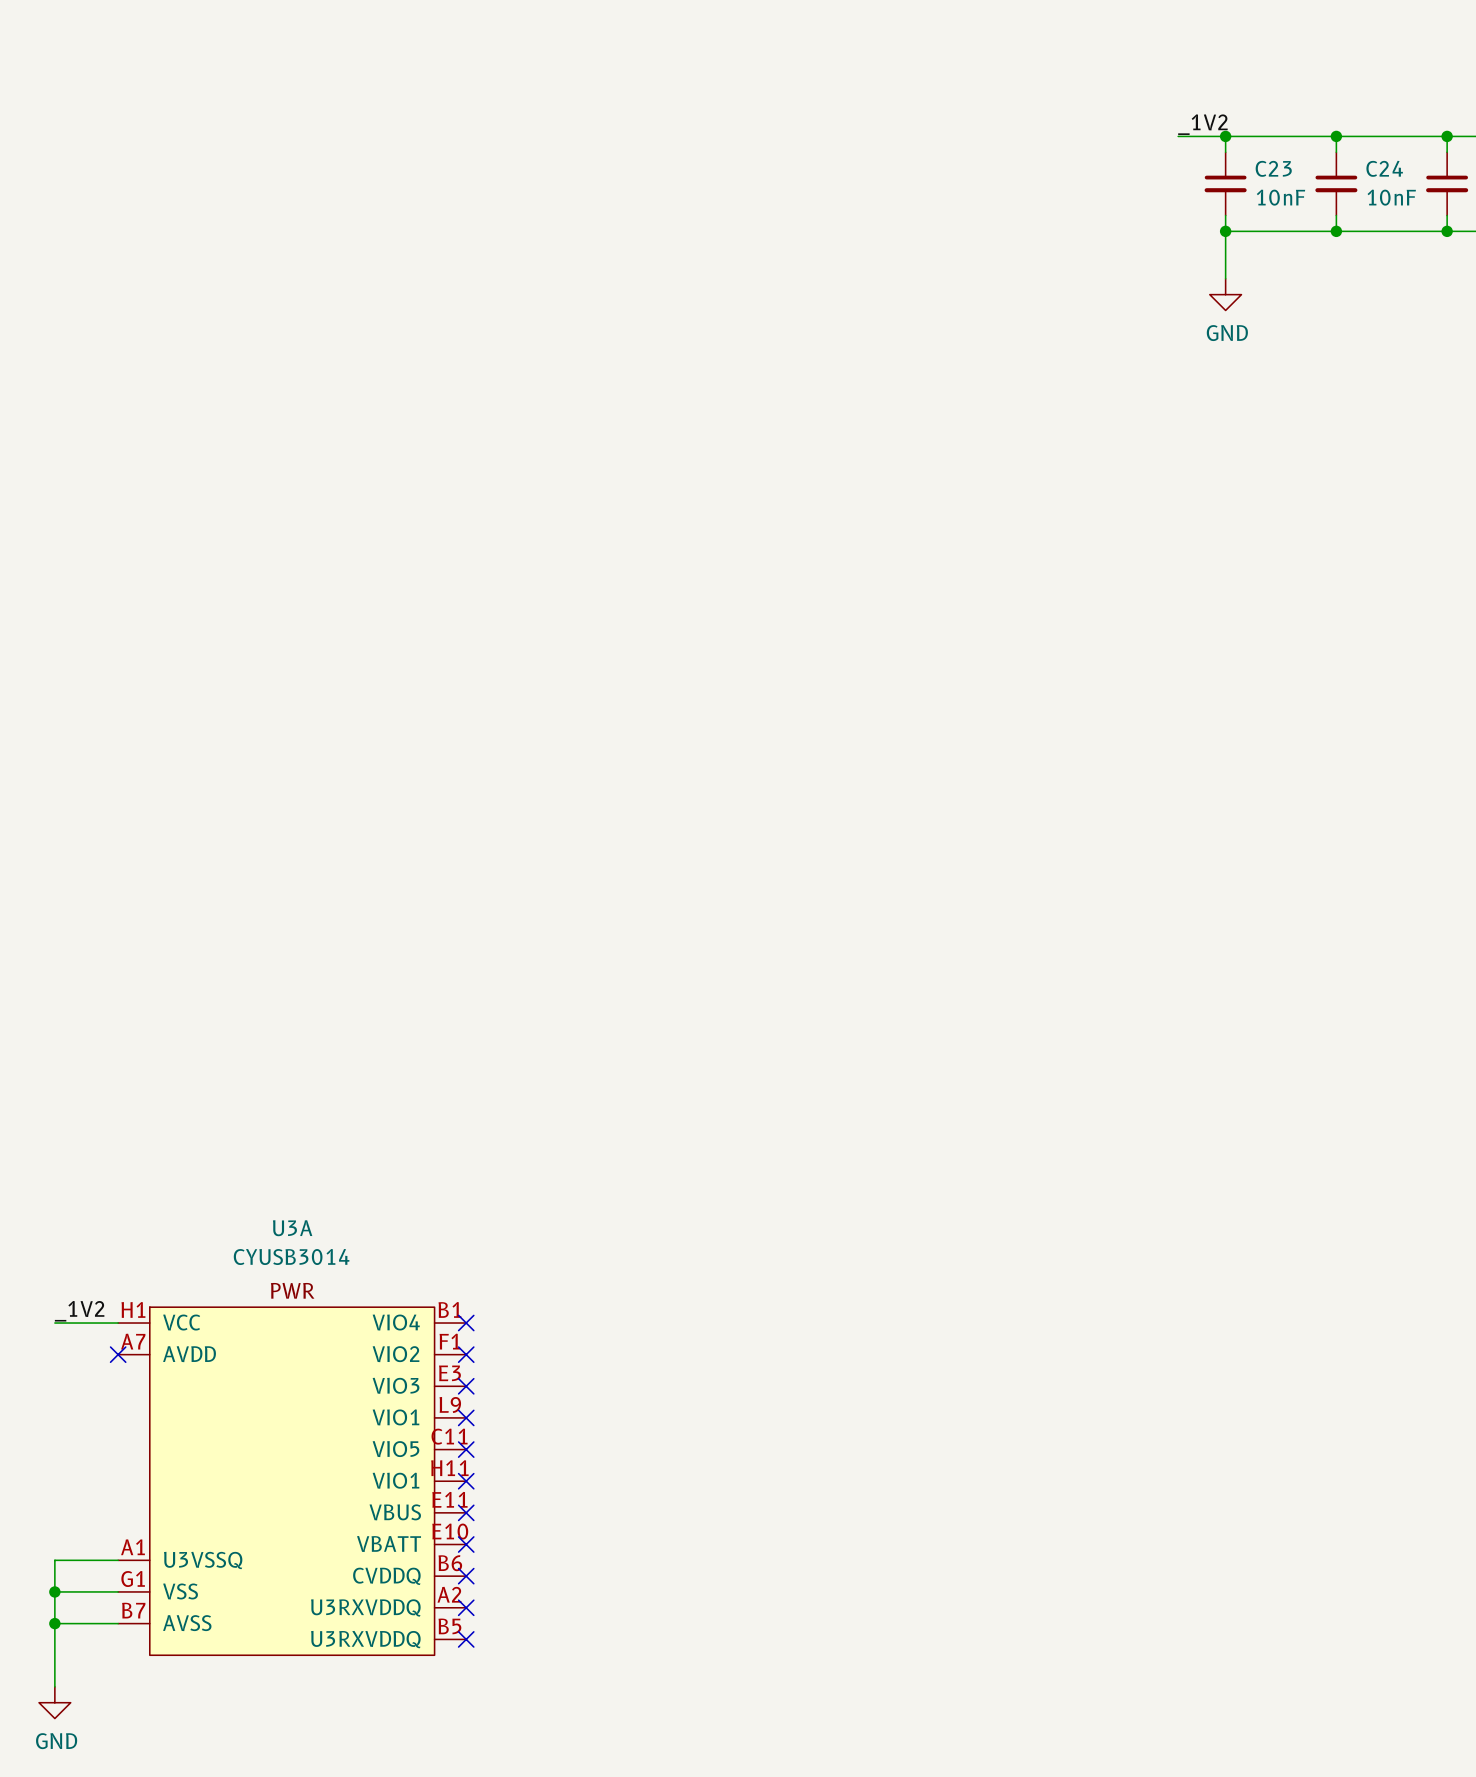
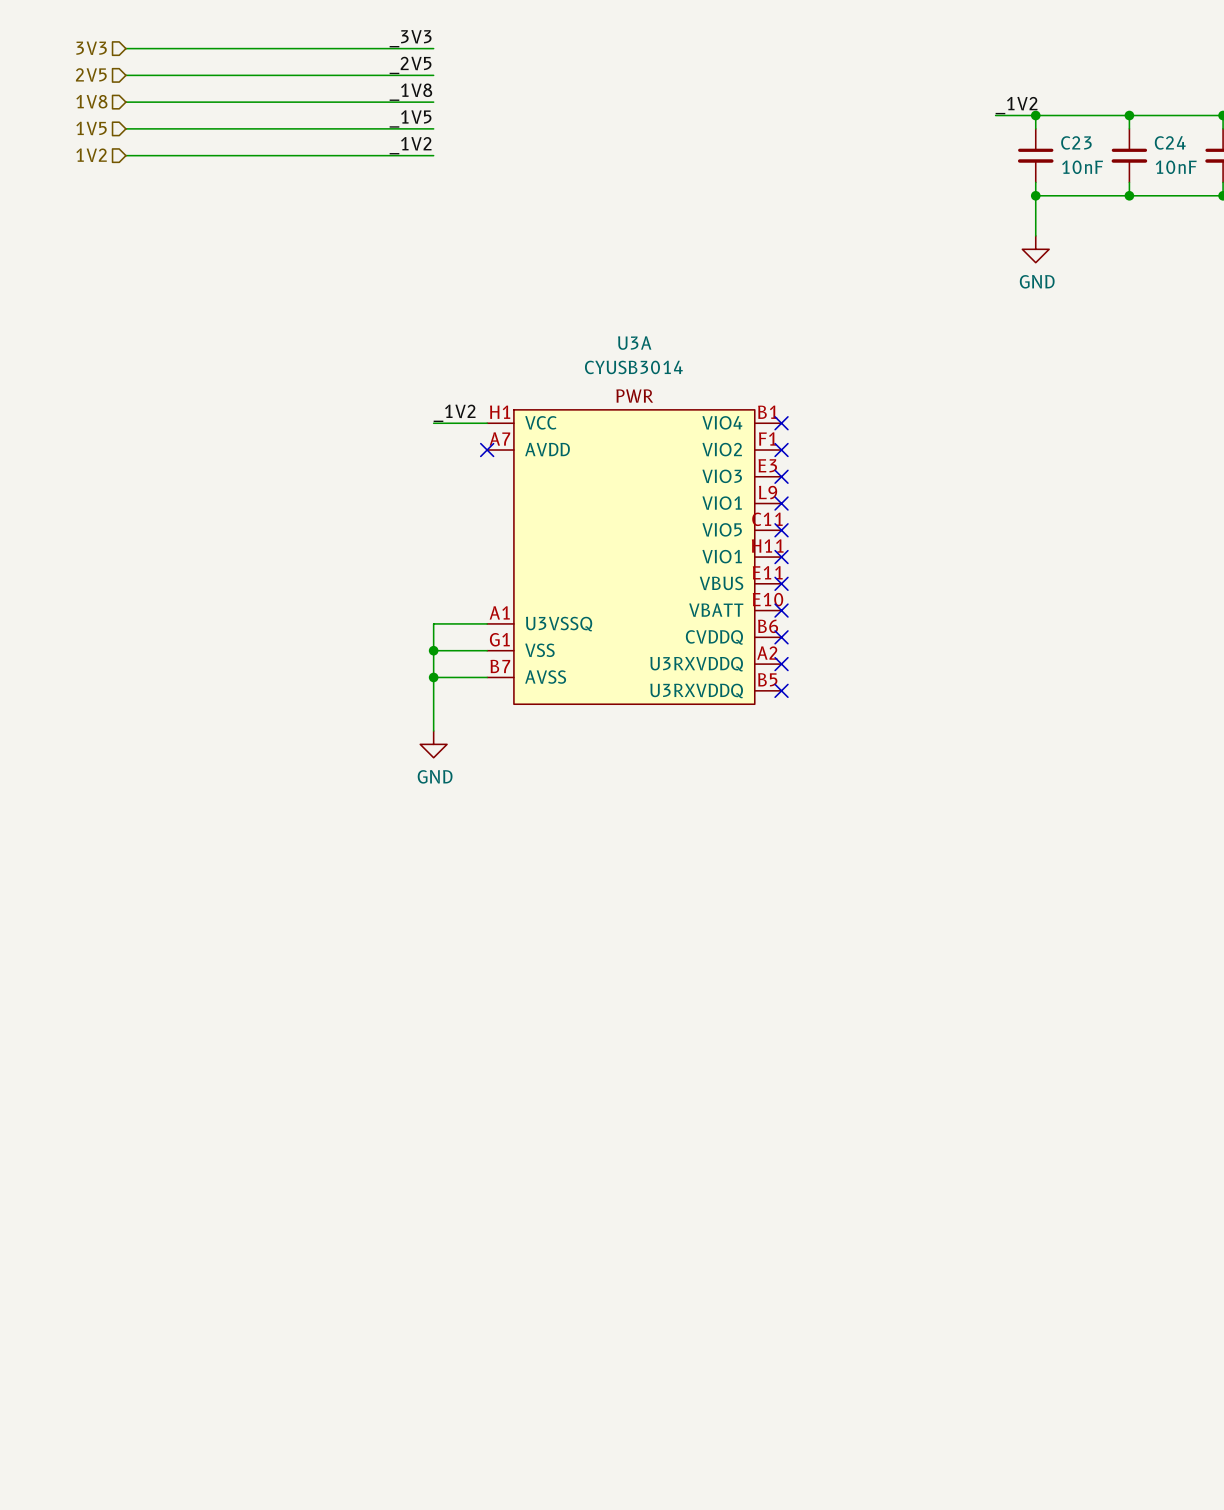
label: none -> _3V3 (410, 38)
hierarchical label: none -> 3V3 (91, 48)
wire: none -> (125, 48) (433, 48)
label: none -> _2V5 (410, 65)
hierarchical label: none -> 2V5 (91, 74)
wire: none -> (125, 75) (433, 75)
label: none -> _1V8 (410, 92)
hierarchical label: none -> 1V8 (91, 101)
wire: none -> (125, 102) (433, 102)
label: none -> _1V5 (410, 118)
hierarchical label: none -> 1V5 (91, 128)
wire: none -> (125, 128) (433, 128)
label: none -> _1V2 (410, 145)
hierarchical label: none -> 1V2 (91, 155)
wire: none -> (125, 155) (433, 155)
label: none -> _1V2 (454, 413)
wire: none -> (433, 423) (487, 423)
no-connect mark: none -> (781, 423)
no-connect mark: none -> (487, 450)
no-connect mark: none -> (781, 450)
no-connect mark: none -> (781, 476)
no-connect mark: none -> (781, 503)
no-connect mark: none -> (781, 530)
no-connect mark: none -> (781, 557)
no-connect mark: none -> (781, 583)
no-connect mark: none -> (781, 610)
wire: none -> (487, 623) (433, 623) (433, 730)
no-connect mark: none -> (781, 637)
wire: none -> (433, 650) (487, 650)
junction: none -> (433, 650)
no-connect mark: none -> (781, 664)
wire: none -> (433, 677) (487, 677)
junction: none -> (433, 677)
no-connect mark: none -> (781, 690)
power symbol: none -> GND (433, 744)
label: _1V2 (79, 1311) -> none
wire: (54, 1323) (118, 1323) -> none
no-connect mark: (466, 1323) -> none
no-connect mark: (118, 1354) -> none
no-connect mark: (466, 1354) -> none
no-connect mark: (466, 1386) -> none
no-connect mark: (466, 1417) -> none
no-connect mark: (466, 1449) -> none
U3A position: (292, 1481) -> (634, 557)
no-connect mark: (466, 1481) -> none
no-connect mark: (466, 1512) -> none
no-connect mark: (466, 1544) -> none
wire: (118, 1560) (54, 1560) (54, 1686) -> none
no-connect mark: (466, 1576) -> none
wire: (54, 1591) (118, 1591) -> none
junction: (54, 1591) -> none
no-connect mark: (466, 1607) -> none
wire: (54, 1623) (118, 1623) -> none
junction: (54, 1623) -> none
no-connect mark: (466, 1639) -> none
power symbol: GND (54, 1702) -> none

